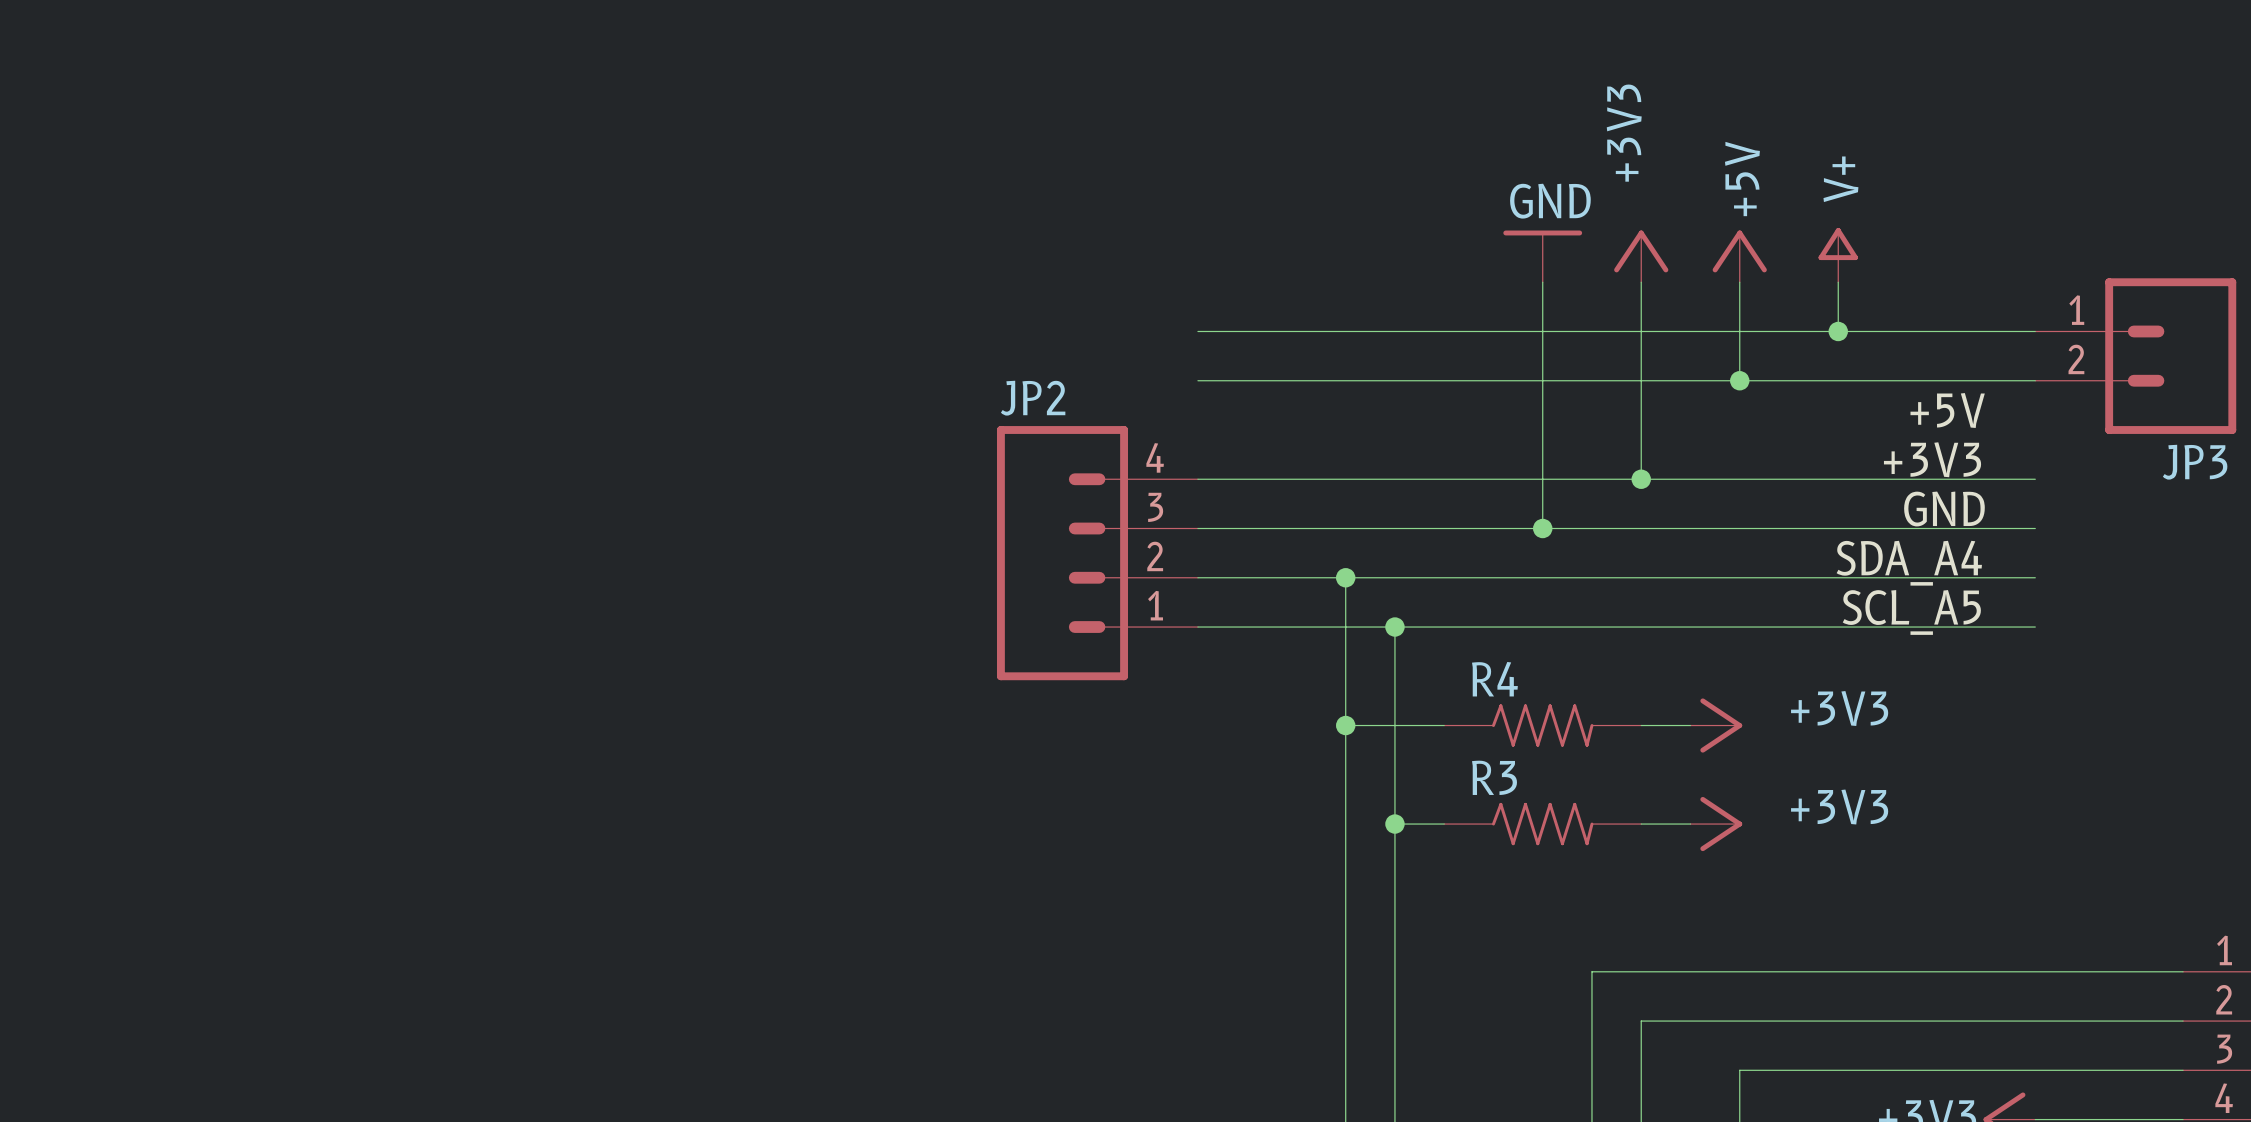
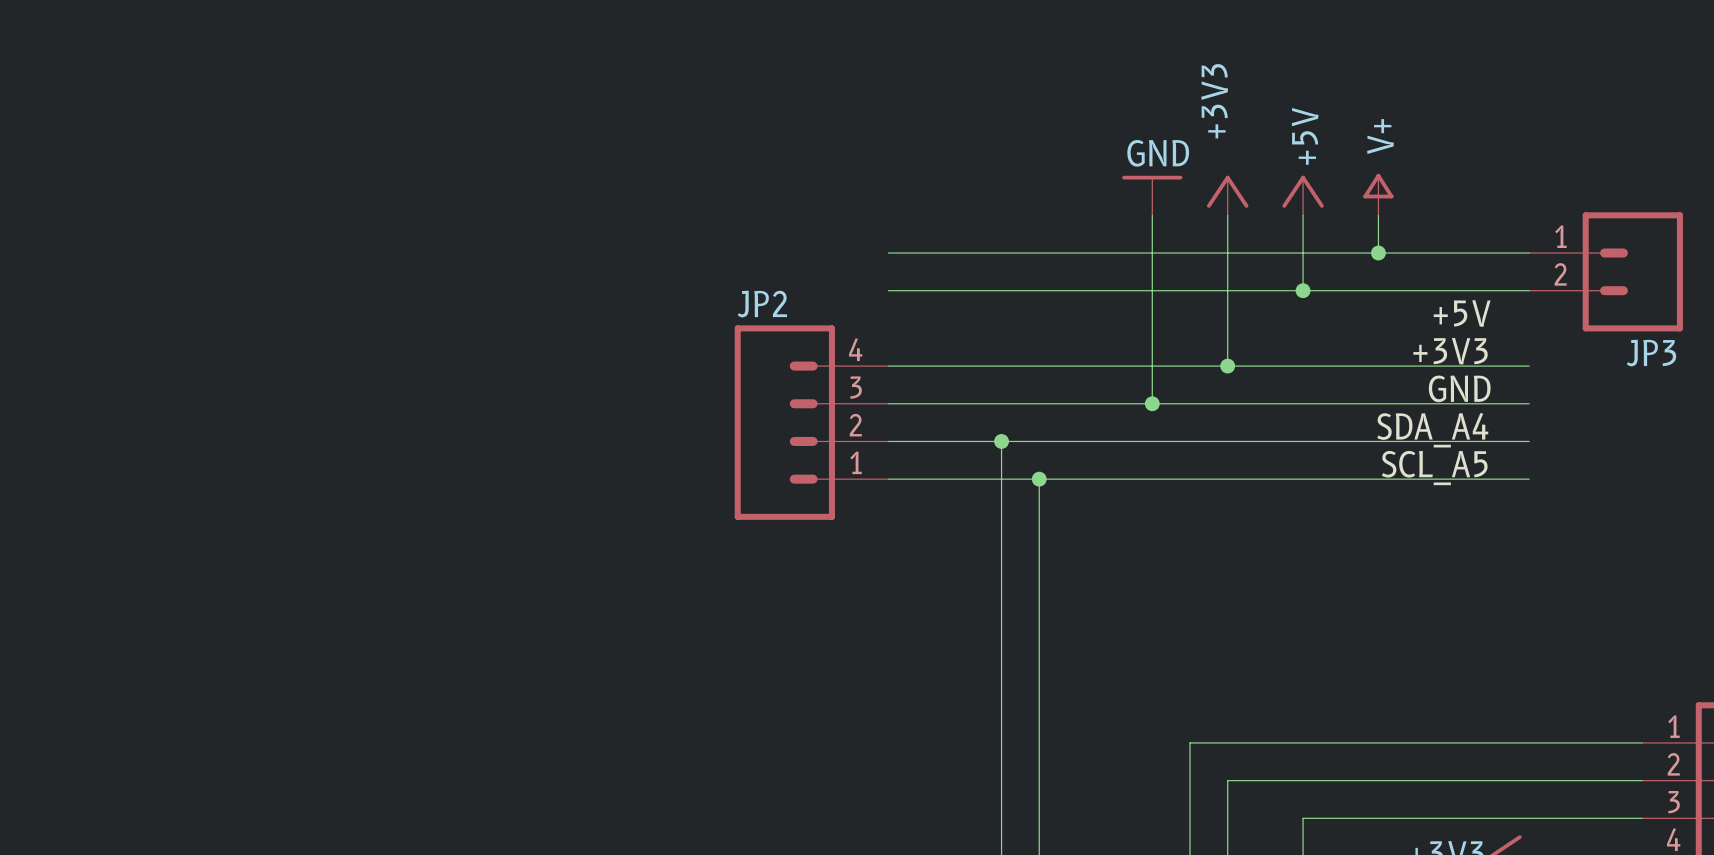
wire: (1345, 725) (1444, 725) -> none
junction: (1345, 725) -> none
R4: (1542, 725) -> none
wire: (1641, 725) (1690, 725) -> none
power symbol: +3V3 (1716, 725) -> none
wire: (1394, 824) (1444, 824) -> none
junction: (1394, 824) -> none
R3: (1542, 824) -> none
wire: (1641, 824) (1690, 824) -> none
power symbol: +3V3 (1716, 824) -> none

